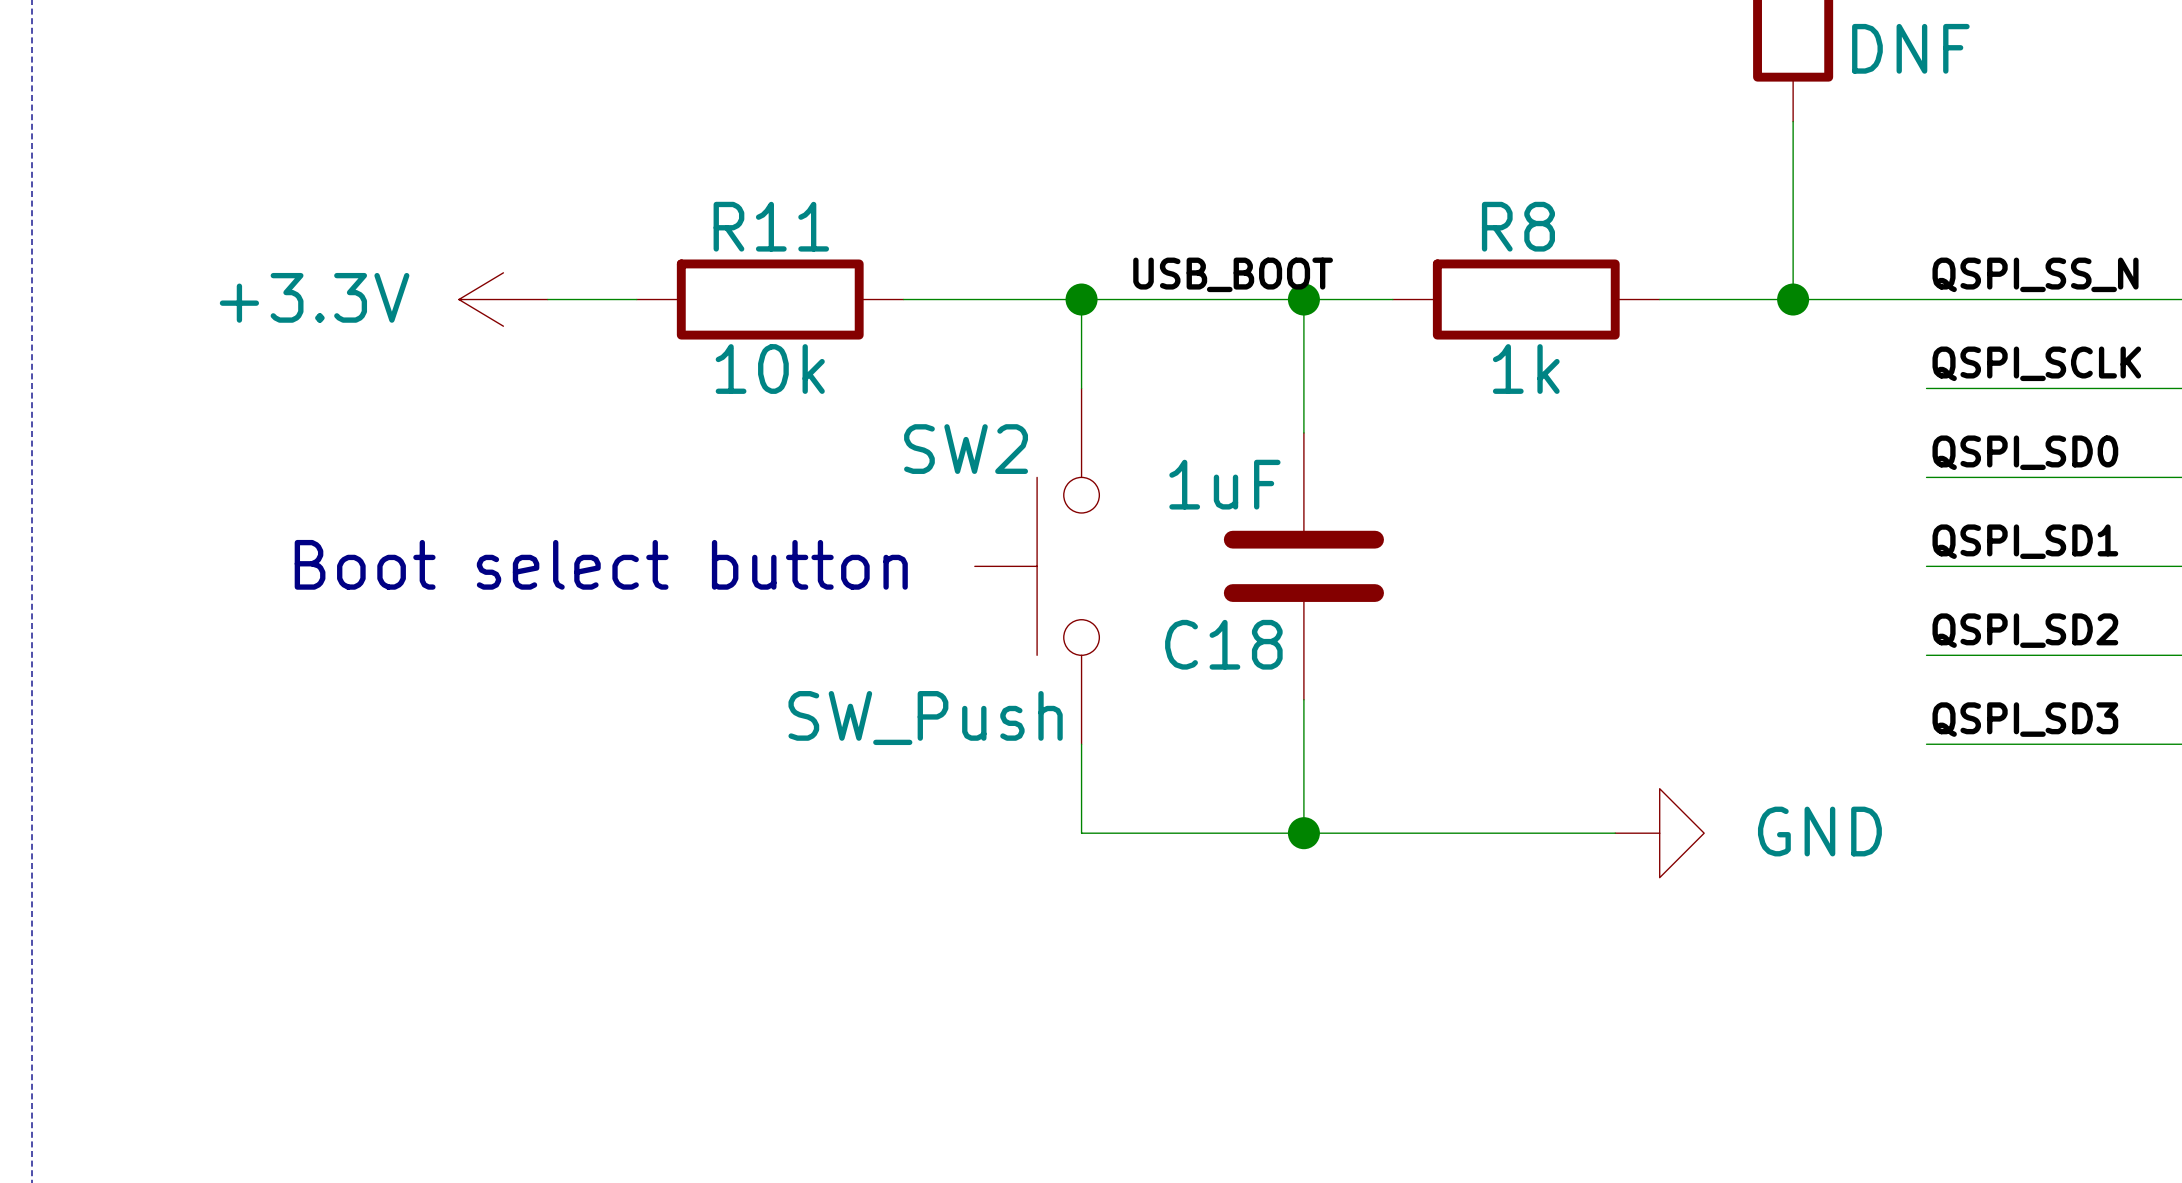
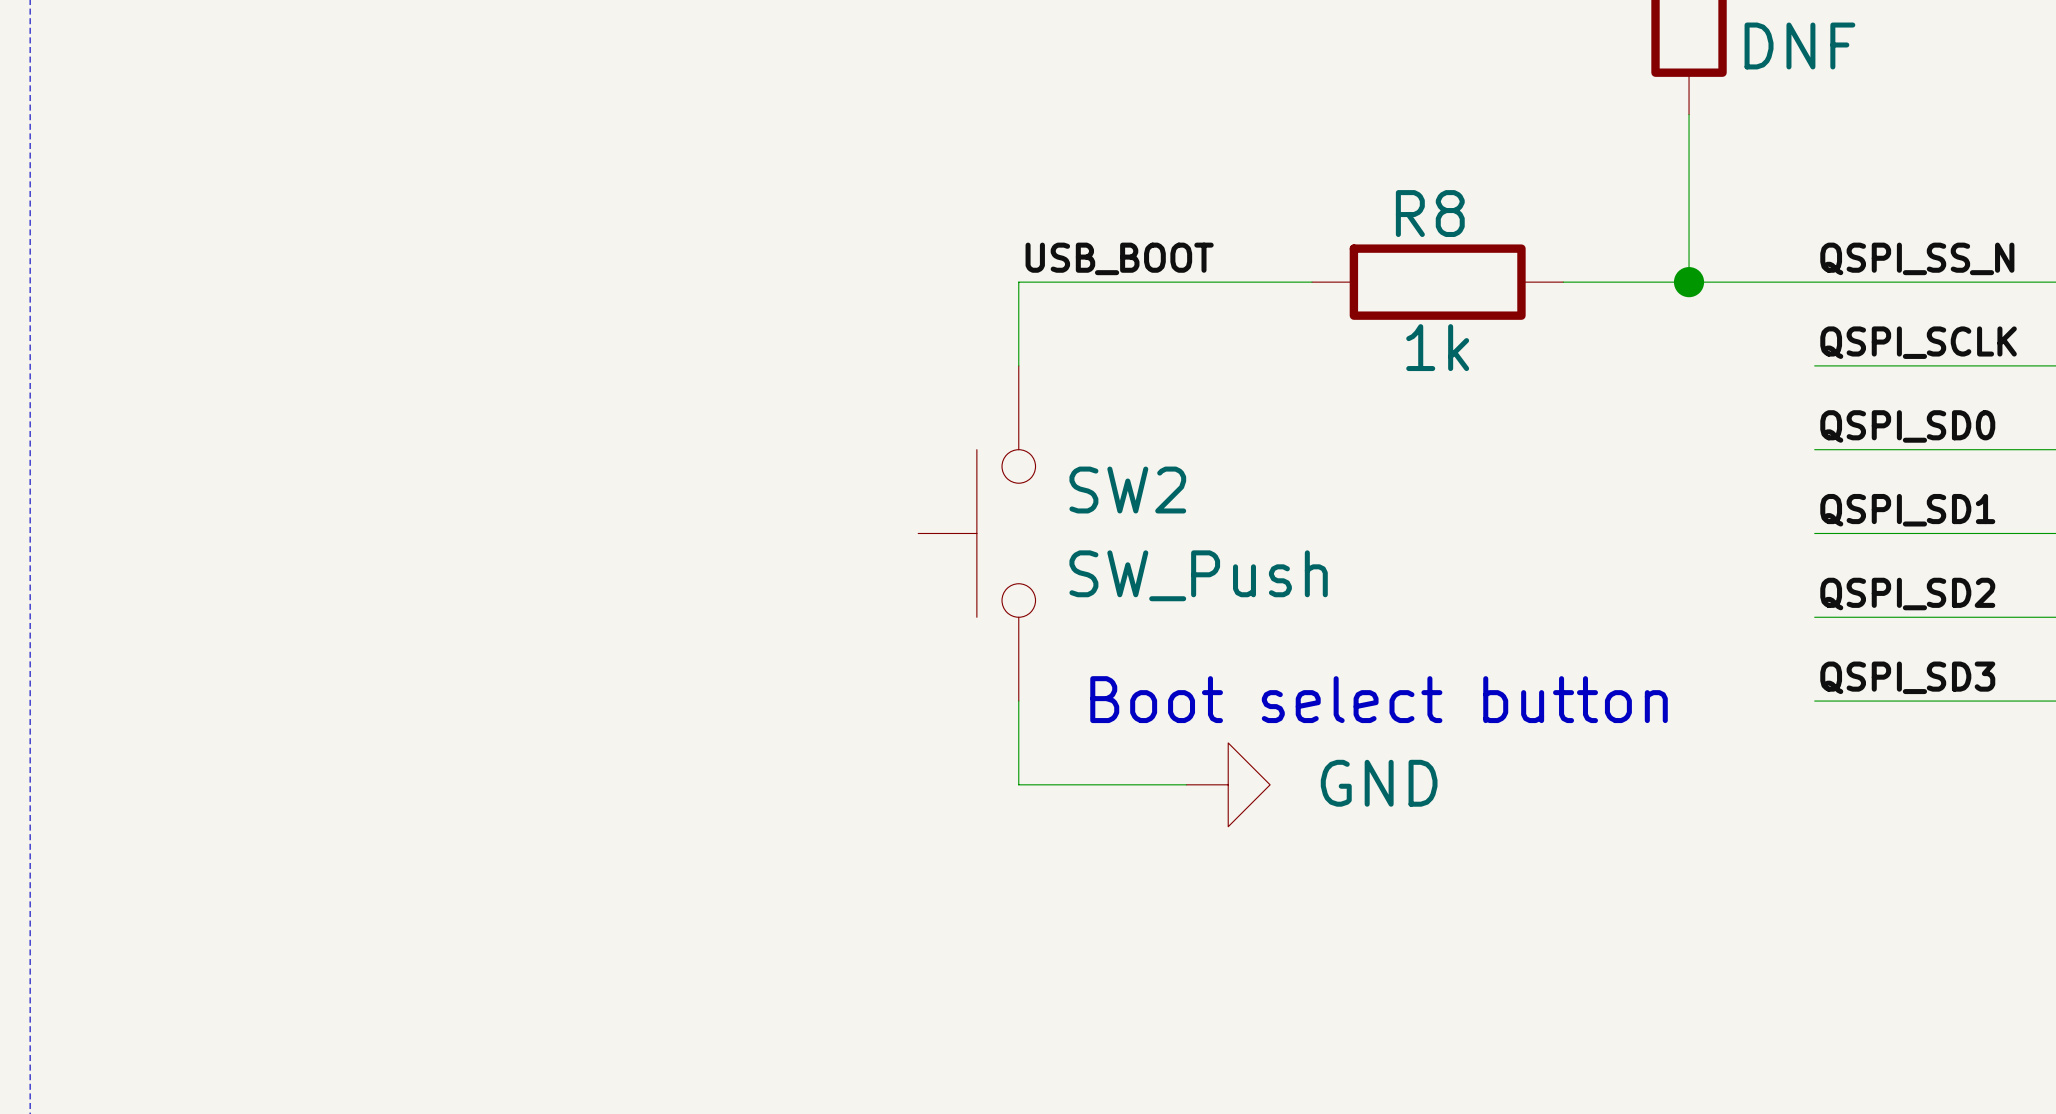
label position: USB_BOOT (1233, 274) -> USB_BOOT (1119, 258)
power symbol: +3.3V (503, 299) -> none
wire: (547, 299) (636, 299) -> none
R11: 10k (770, 299) -> none
wire: (903, 299) (1081, 299) -> none
junction: (1081, 299) -> none
wire: (1303, 299) (1303, 432) -> none
junction: (1303, 299) -> none
SW2 name position: SW2 (966, 449) -> SW2 (1127, 490)
text: Boot select button (601, 564) -> none
C18: 1uF (1303, 566) -> none
wire: (1303, 699) (1303, 833) -> none
SW2 value position: SW_Push (925, 718) -> SW_Push (1198, 575)
text: none -> Boot select button (1379, 699)
wire: (1259, 833) (1615, 833) -> none
junction: (1303, 833) -> none
power symbol position: GND (1659, 833) -> GND (1228, 784)

